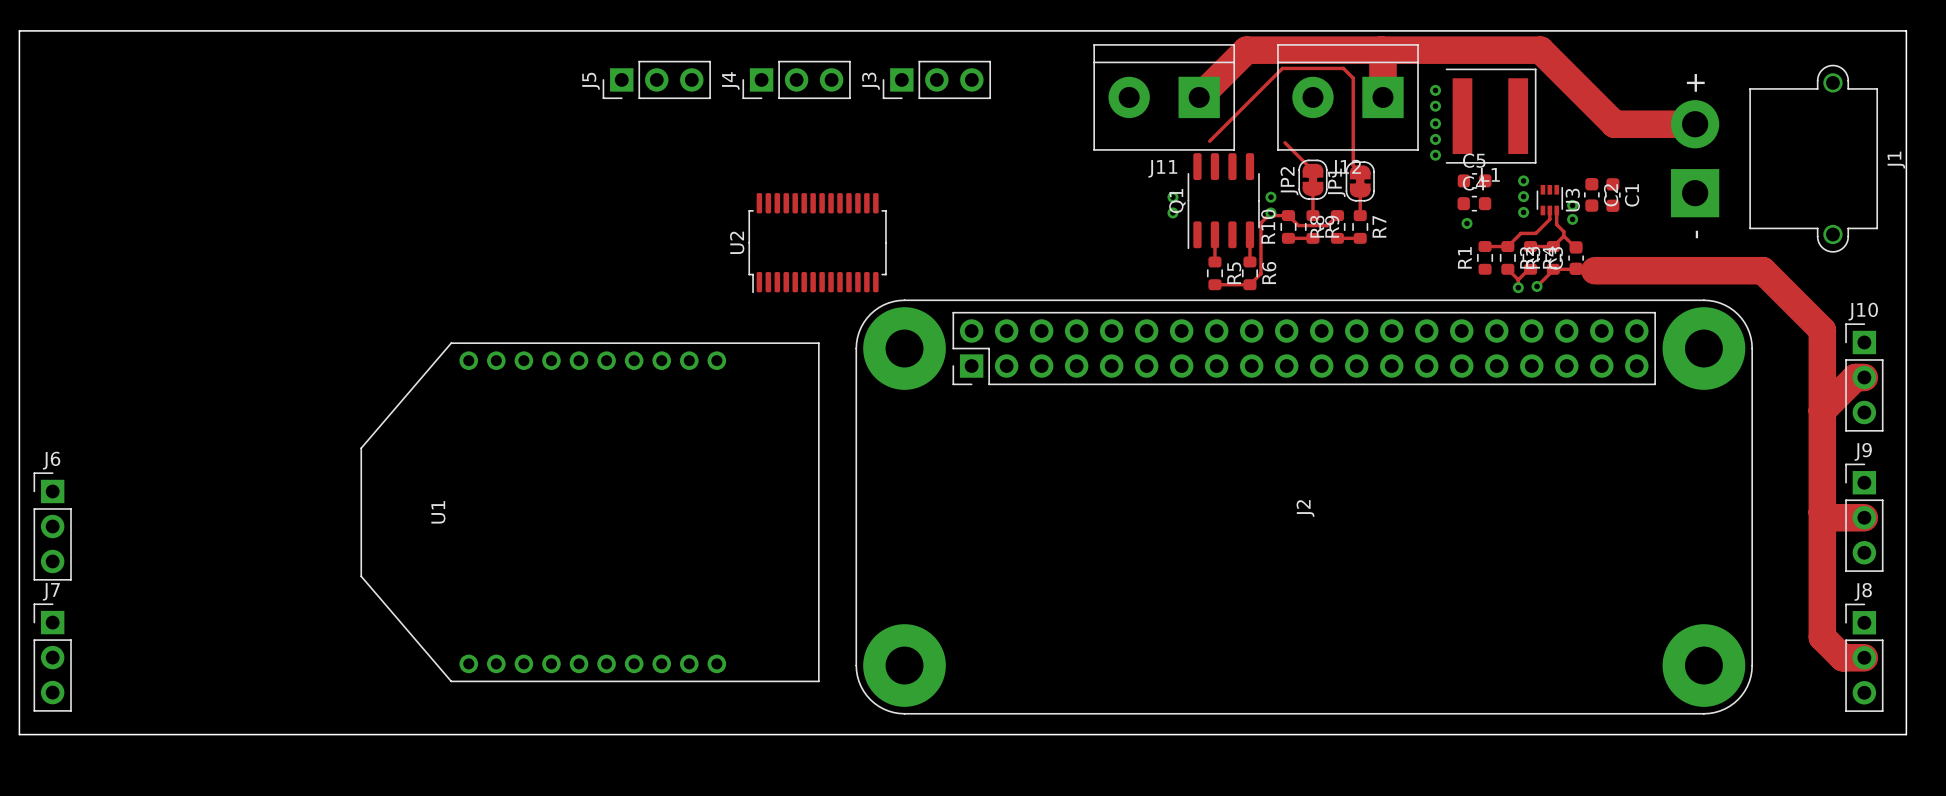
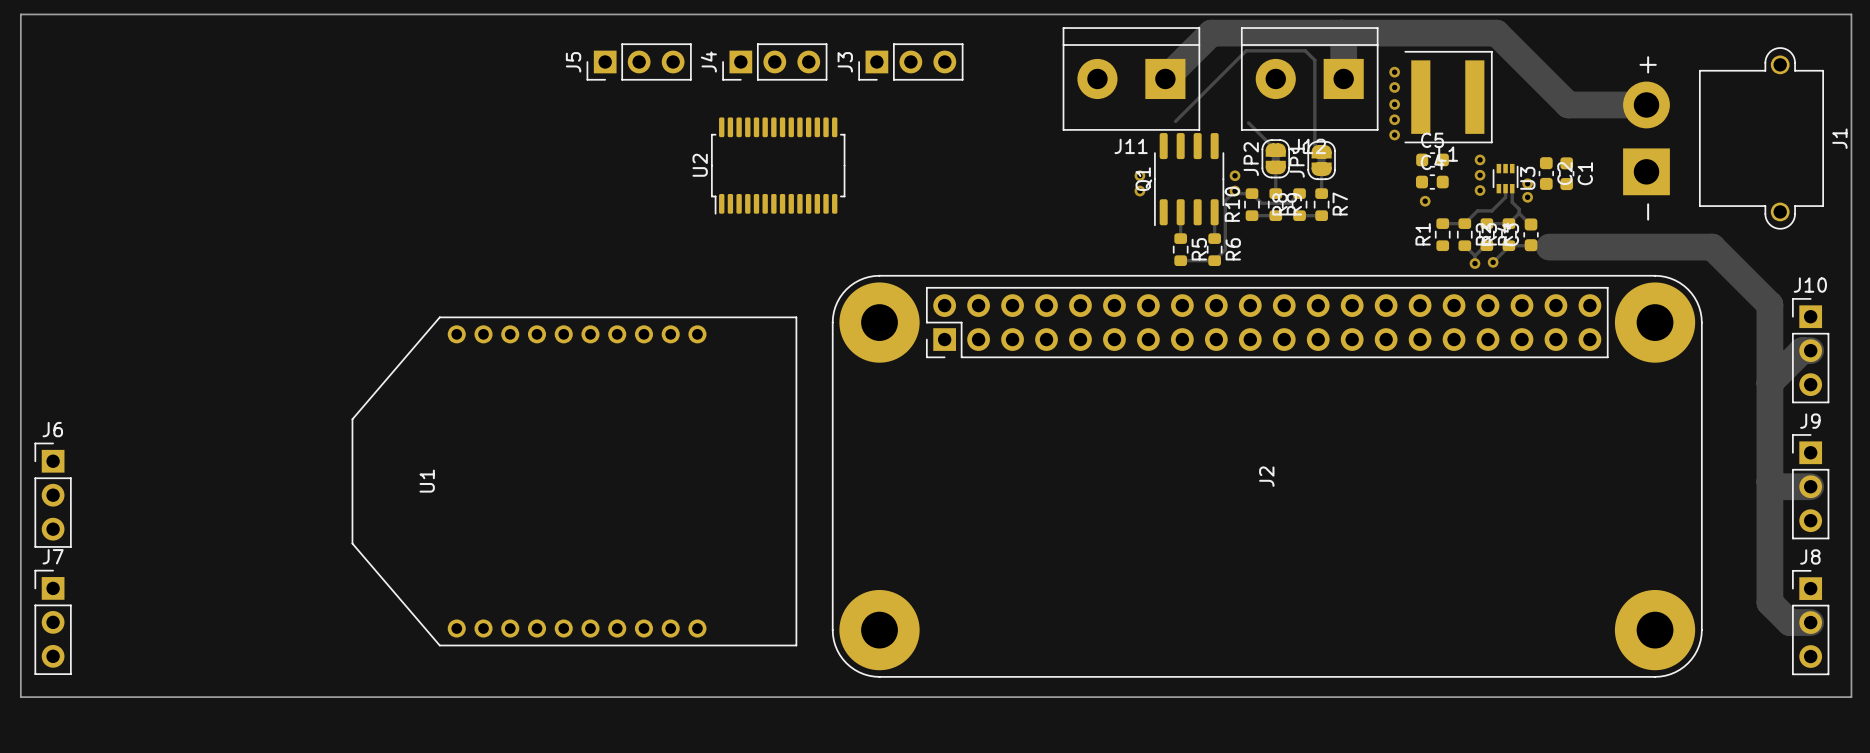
U2 position: (817, 243) -> (778, 165)

